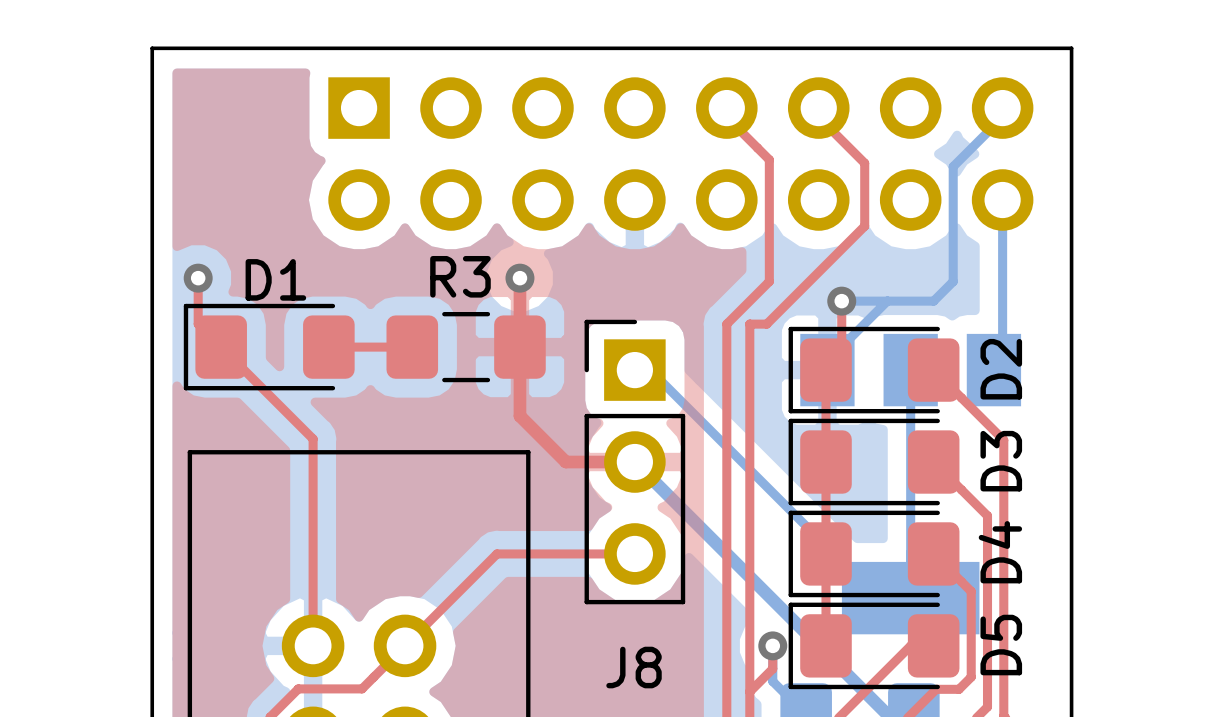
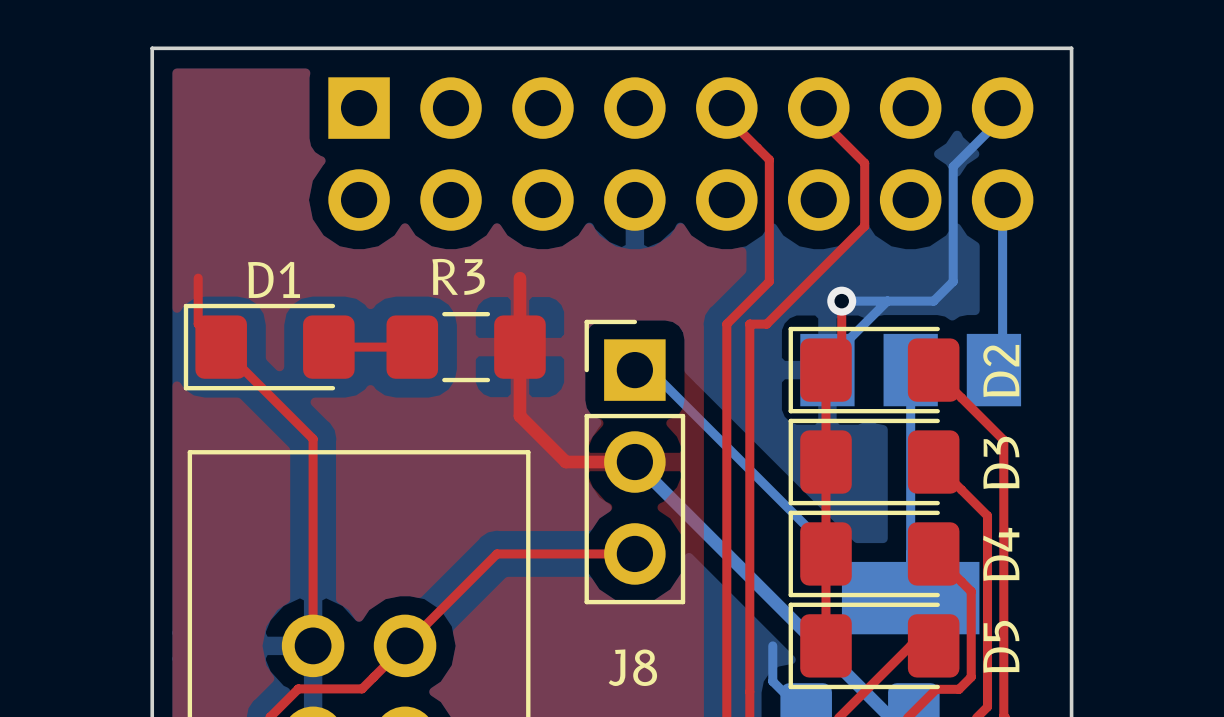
via: (198, 278) -> none
via: (519, 278) -> none
top track: (772, 645) (772, 668) (749, 691) -> none
via: (772, 645) -> none

